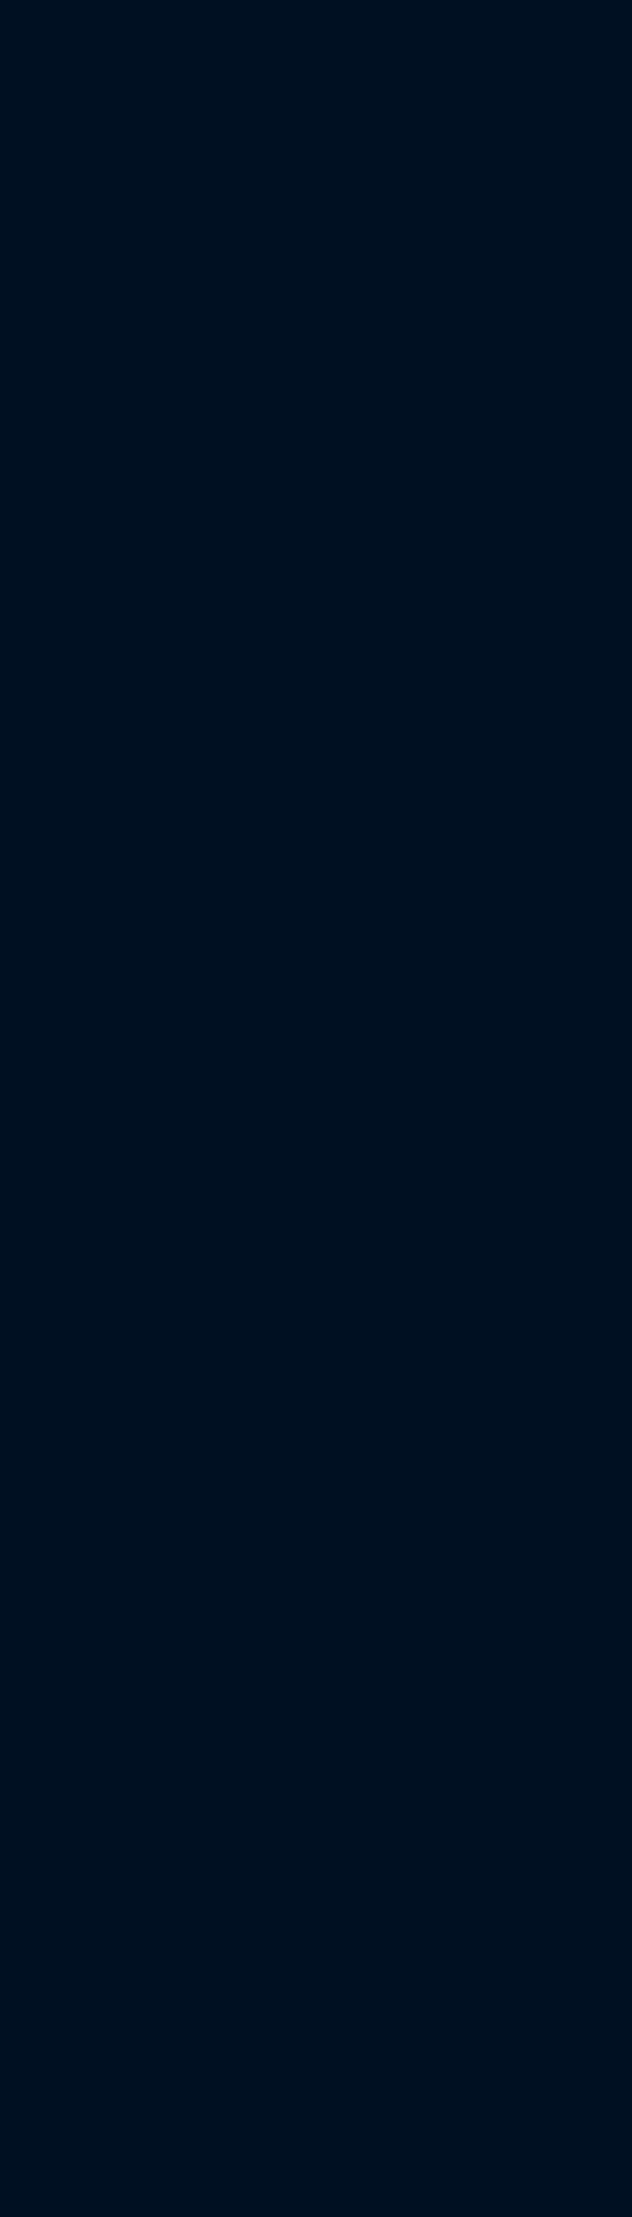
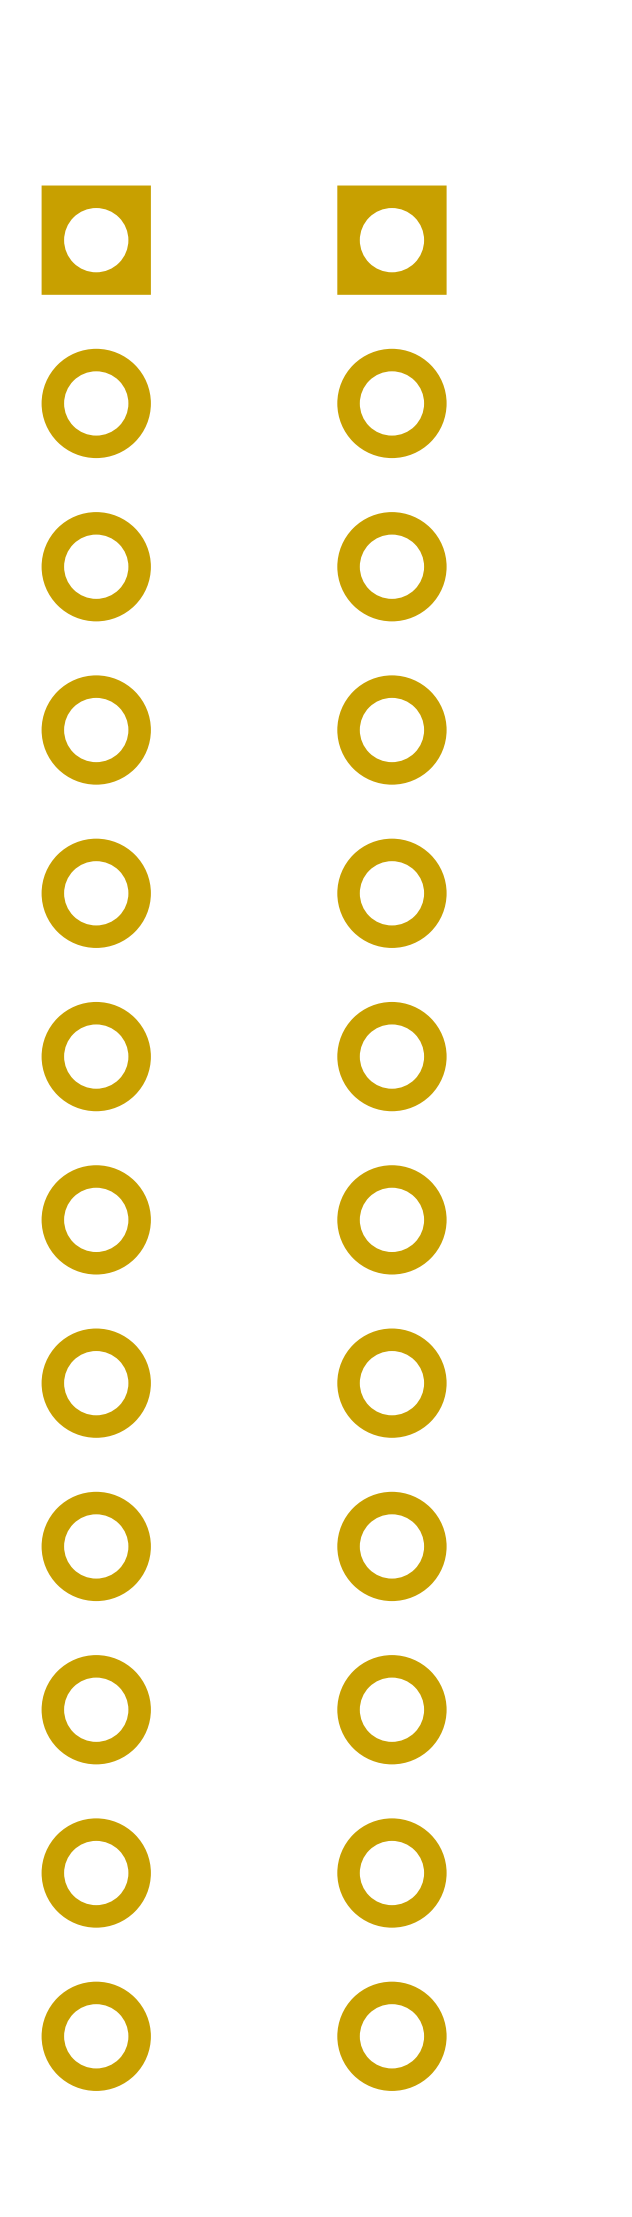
part: none -> (96, 1138)
part: none -> (391, 1138)

